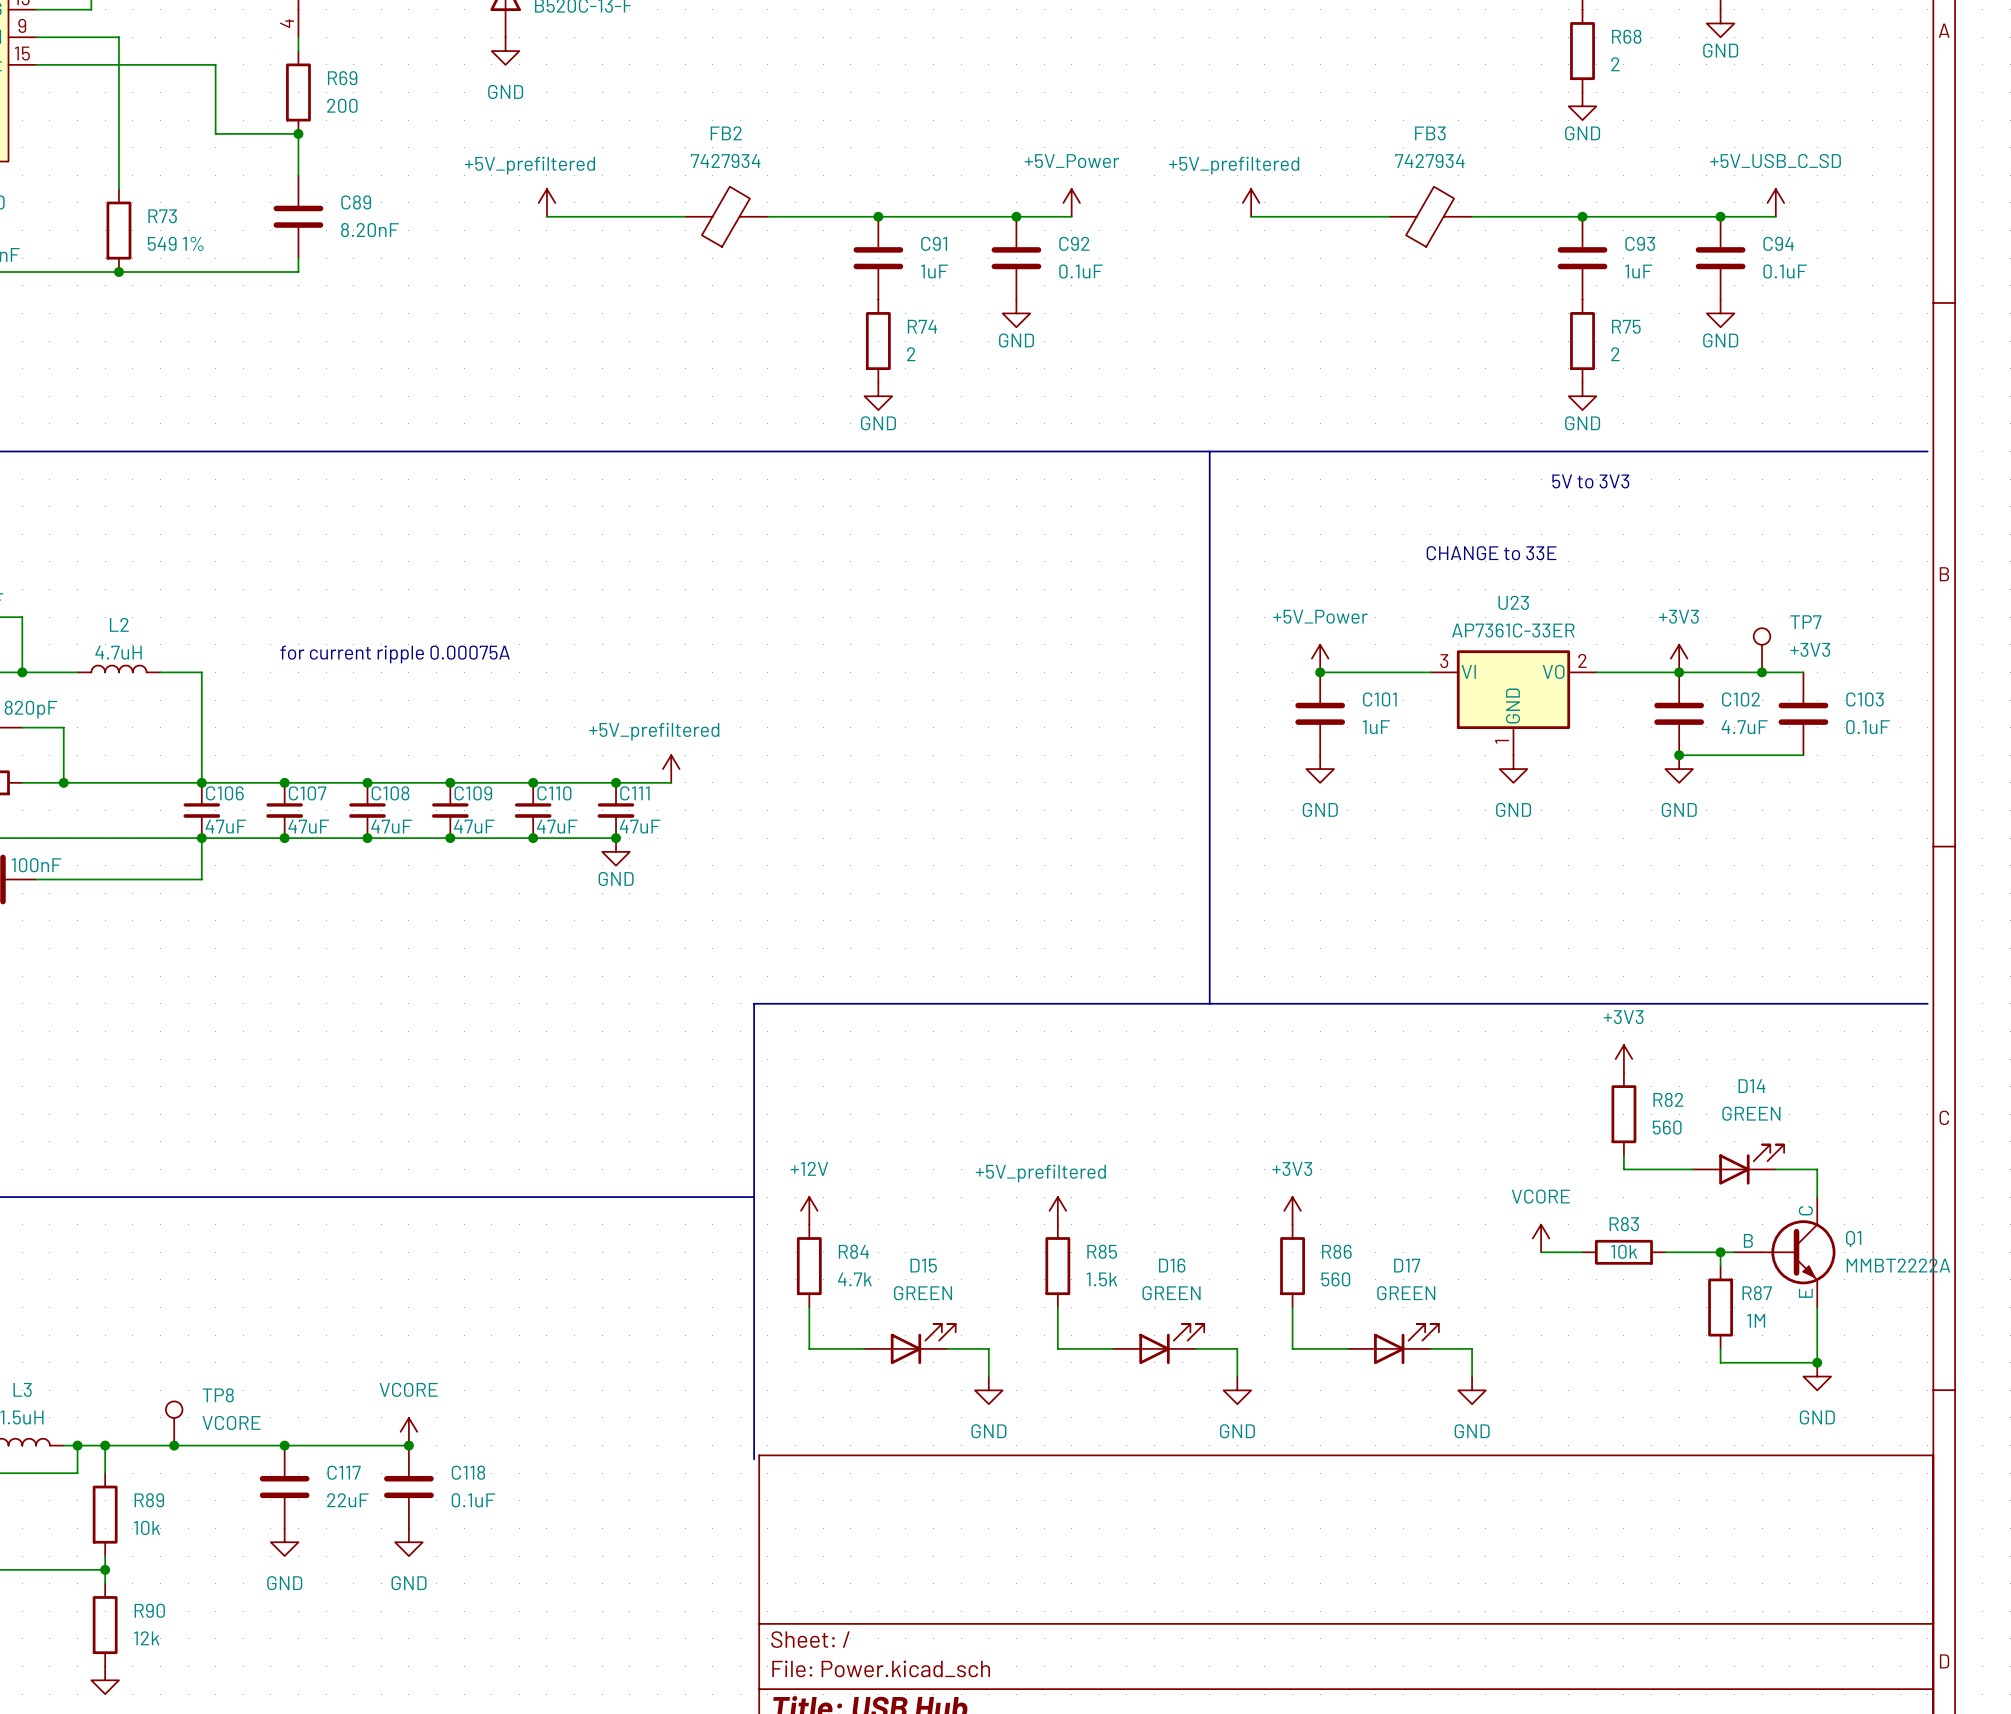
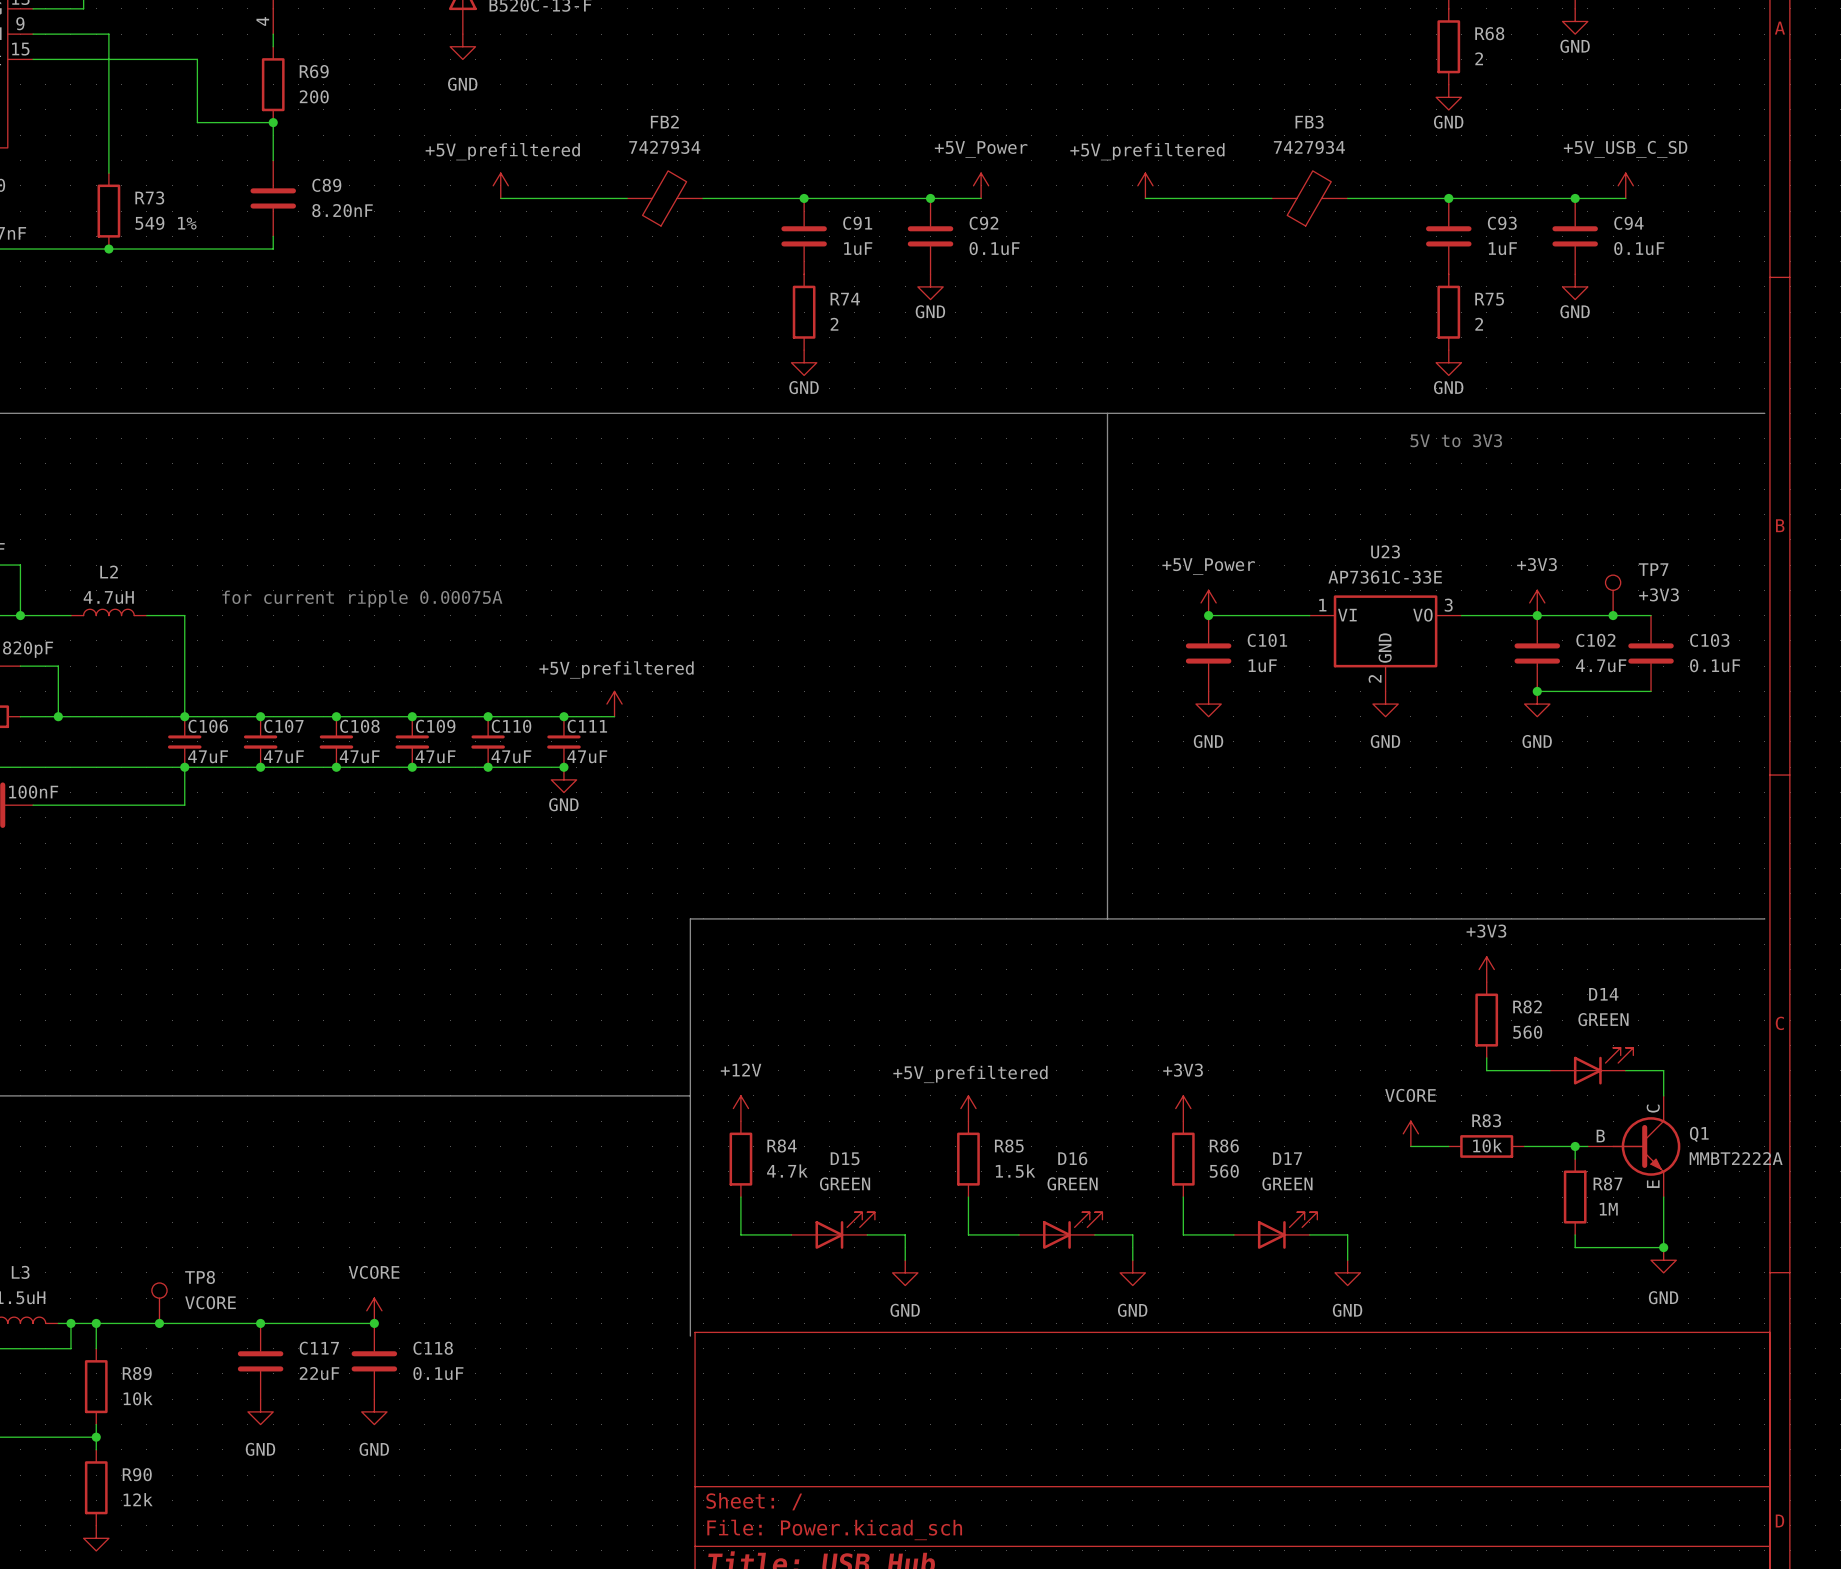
text: CHANGE to 33E (1491, 553) -> none
U23 value: AP7361C-33ER (1513, 630) -> AP7361C-33E (1385, 577)
U23 pin number: 2 (1582, 660) -> 3 (1448, 605)
U23 pin number: 3 (1444, 661) -> 1 (1322, 605)
U23 pin number: 1 (1502, 741) -> 2 (1375, 678)

